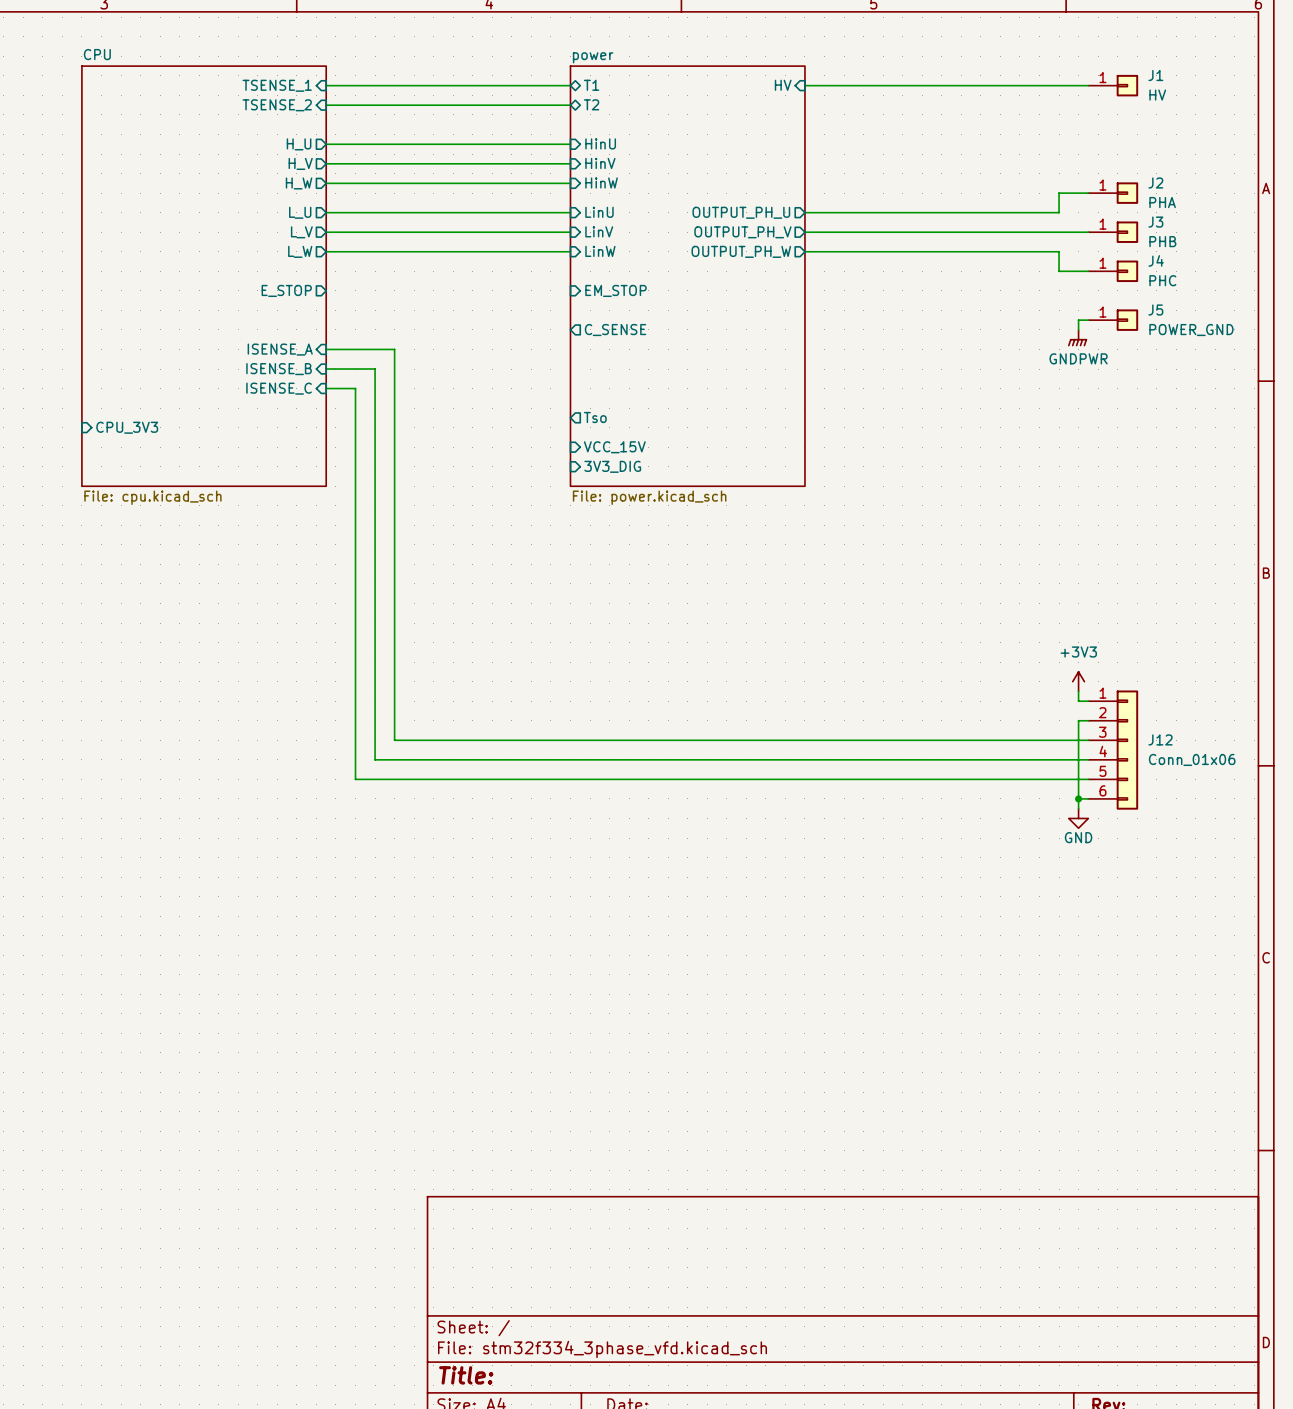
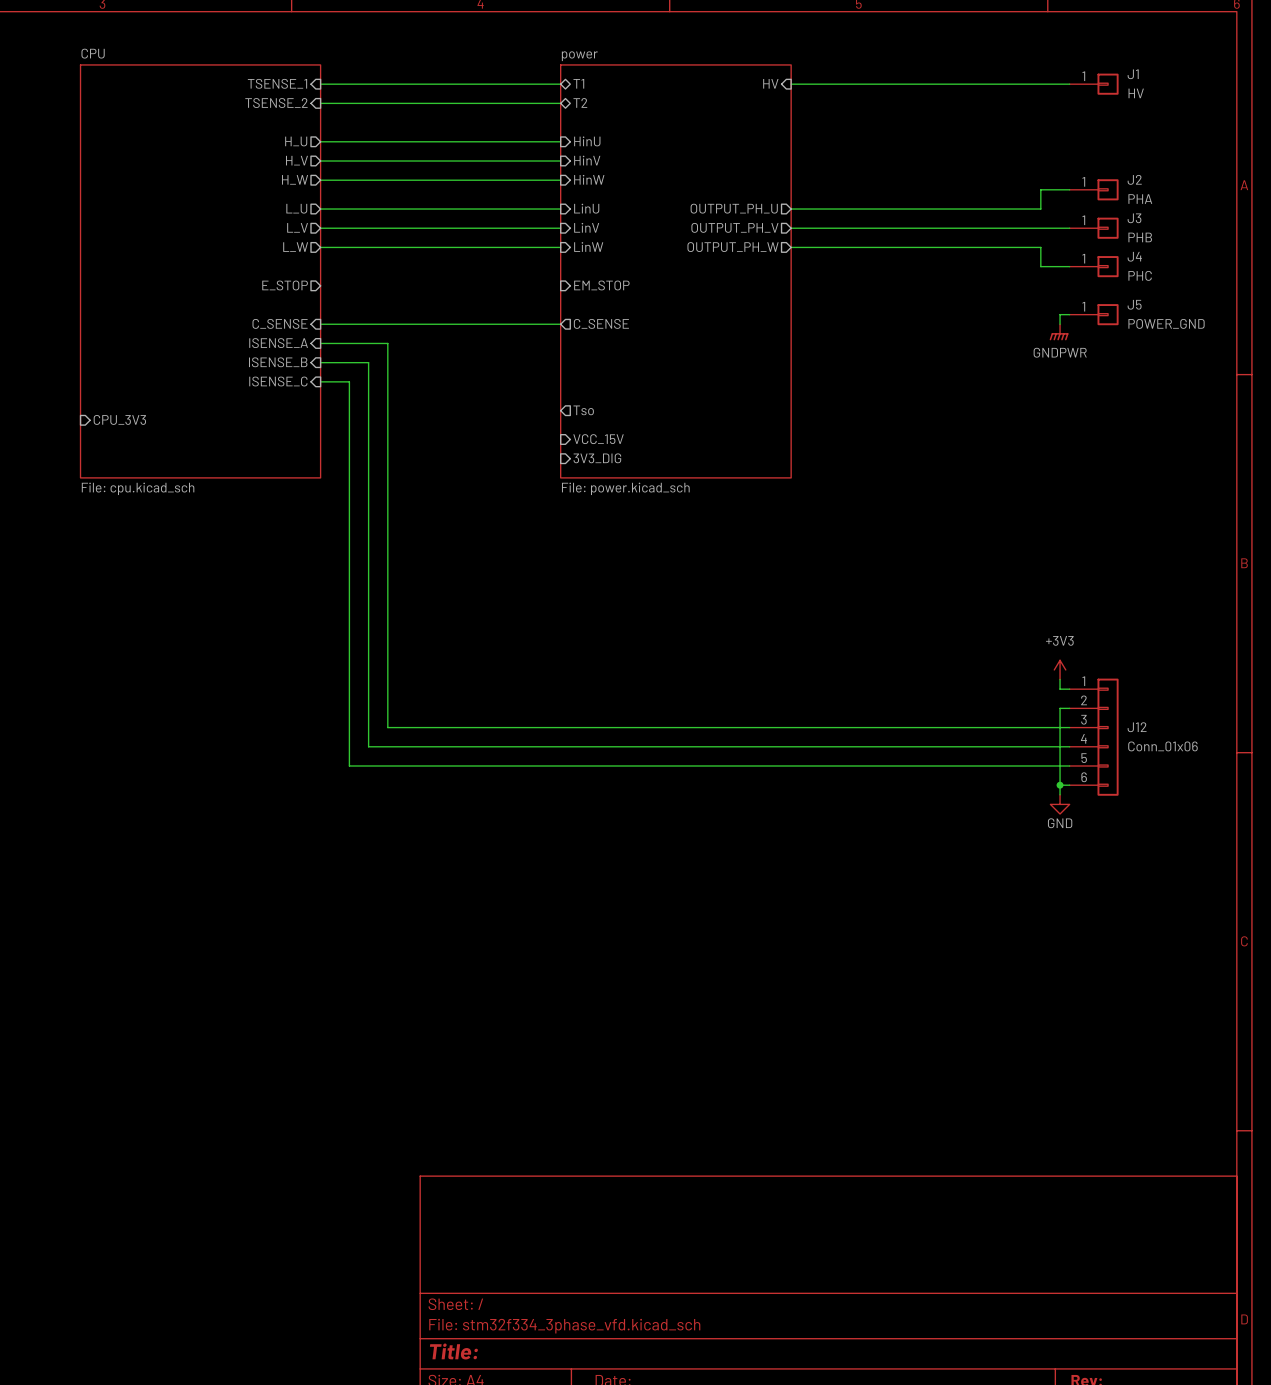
wire: none -> (320, 324) (560, 324)
sheet pin: none -> C_SENSE (280, 323)

